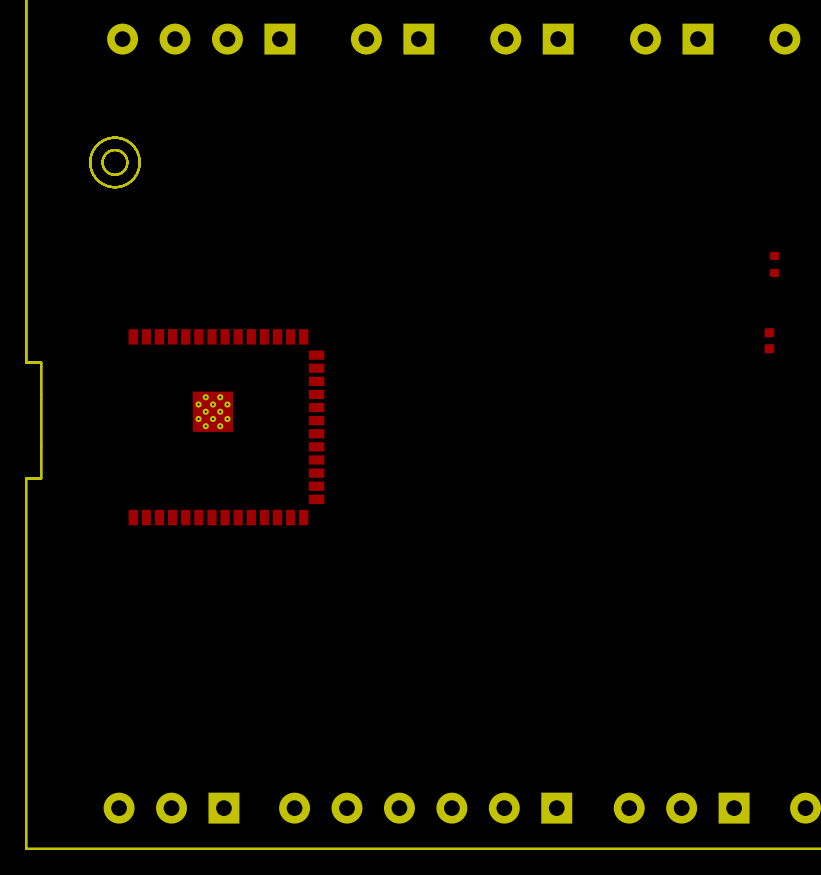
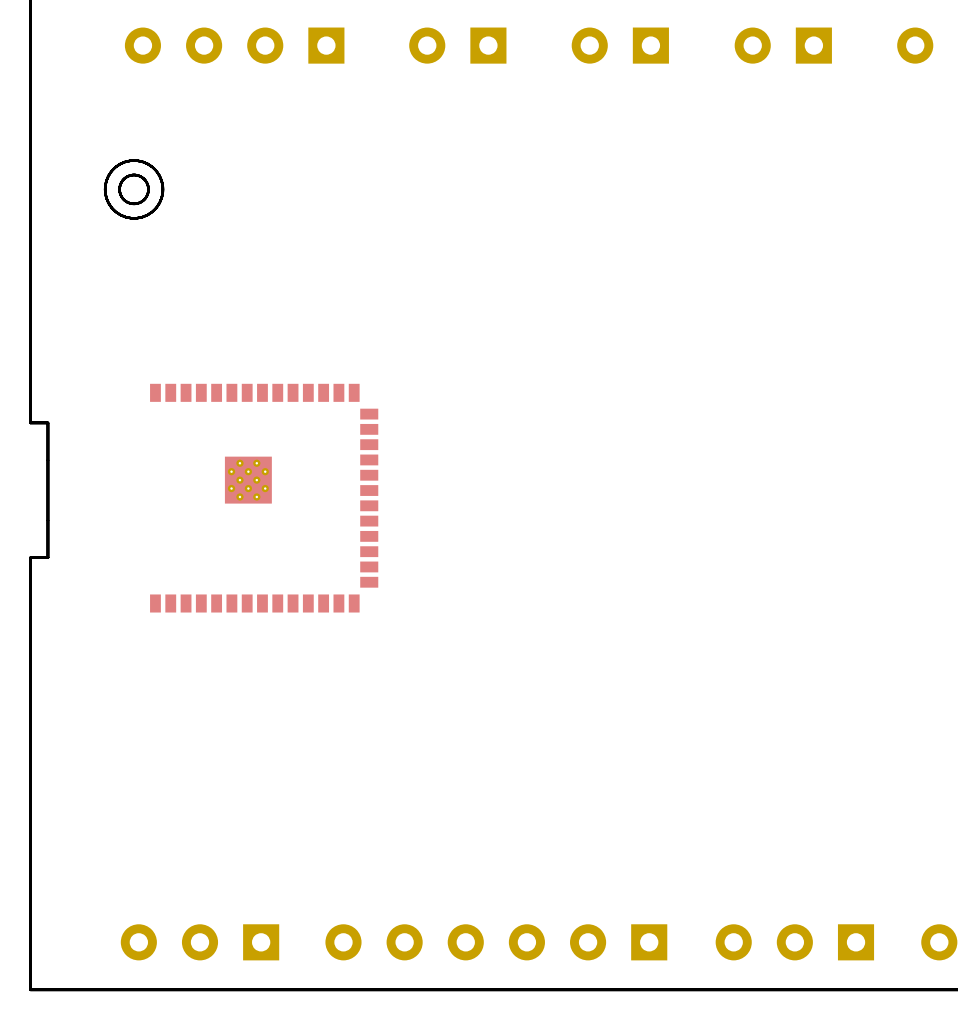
part: (774, 264) -> none
part: (769, 340) -> none

